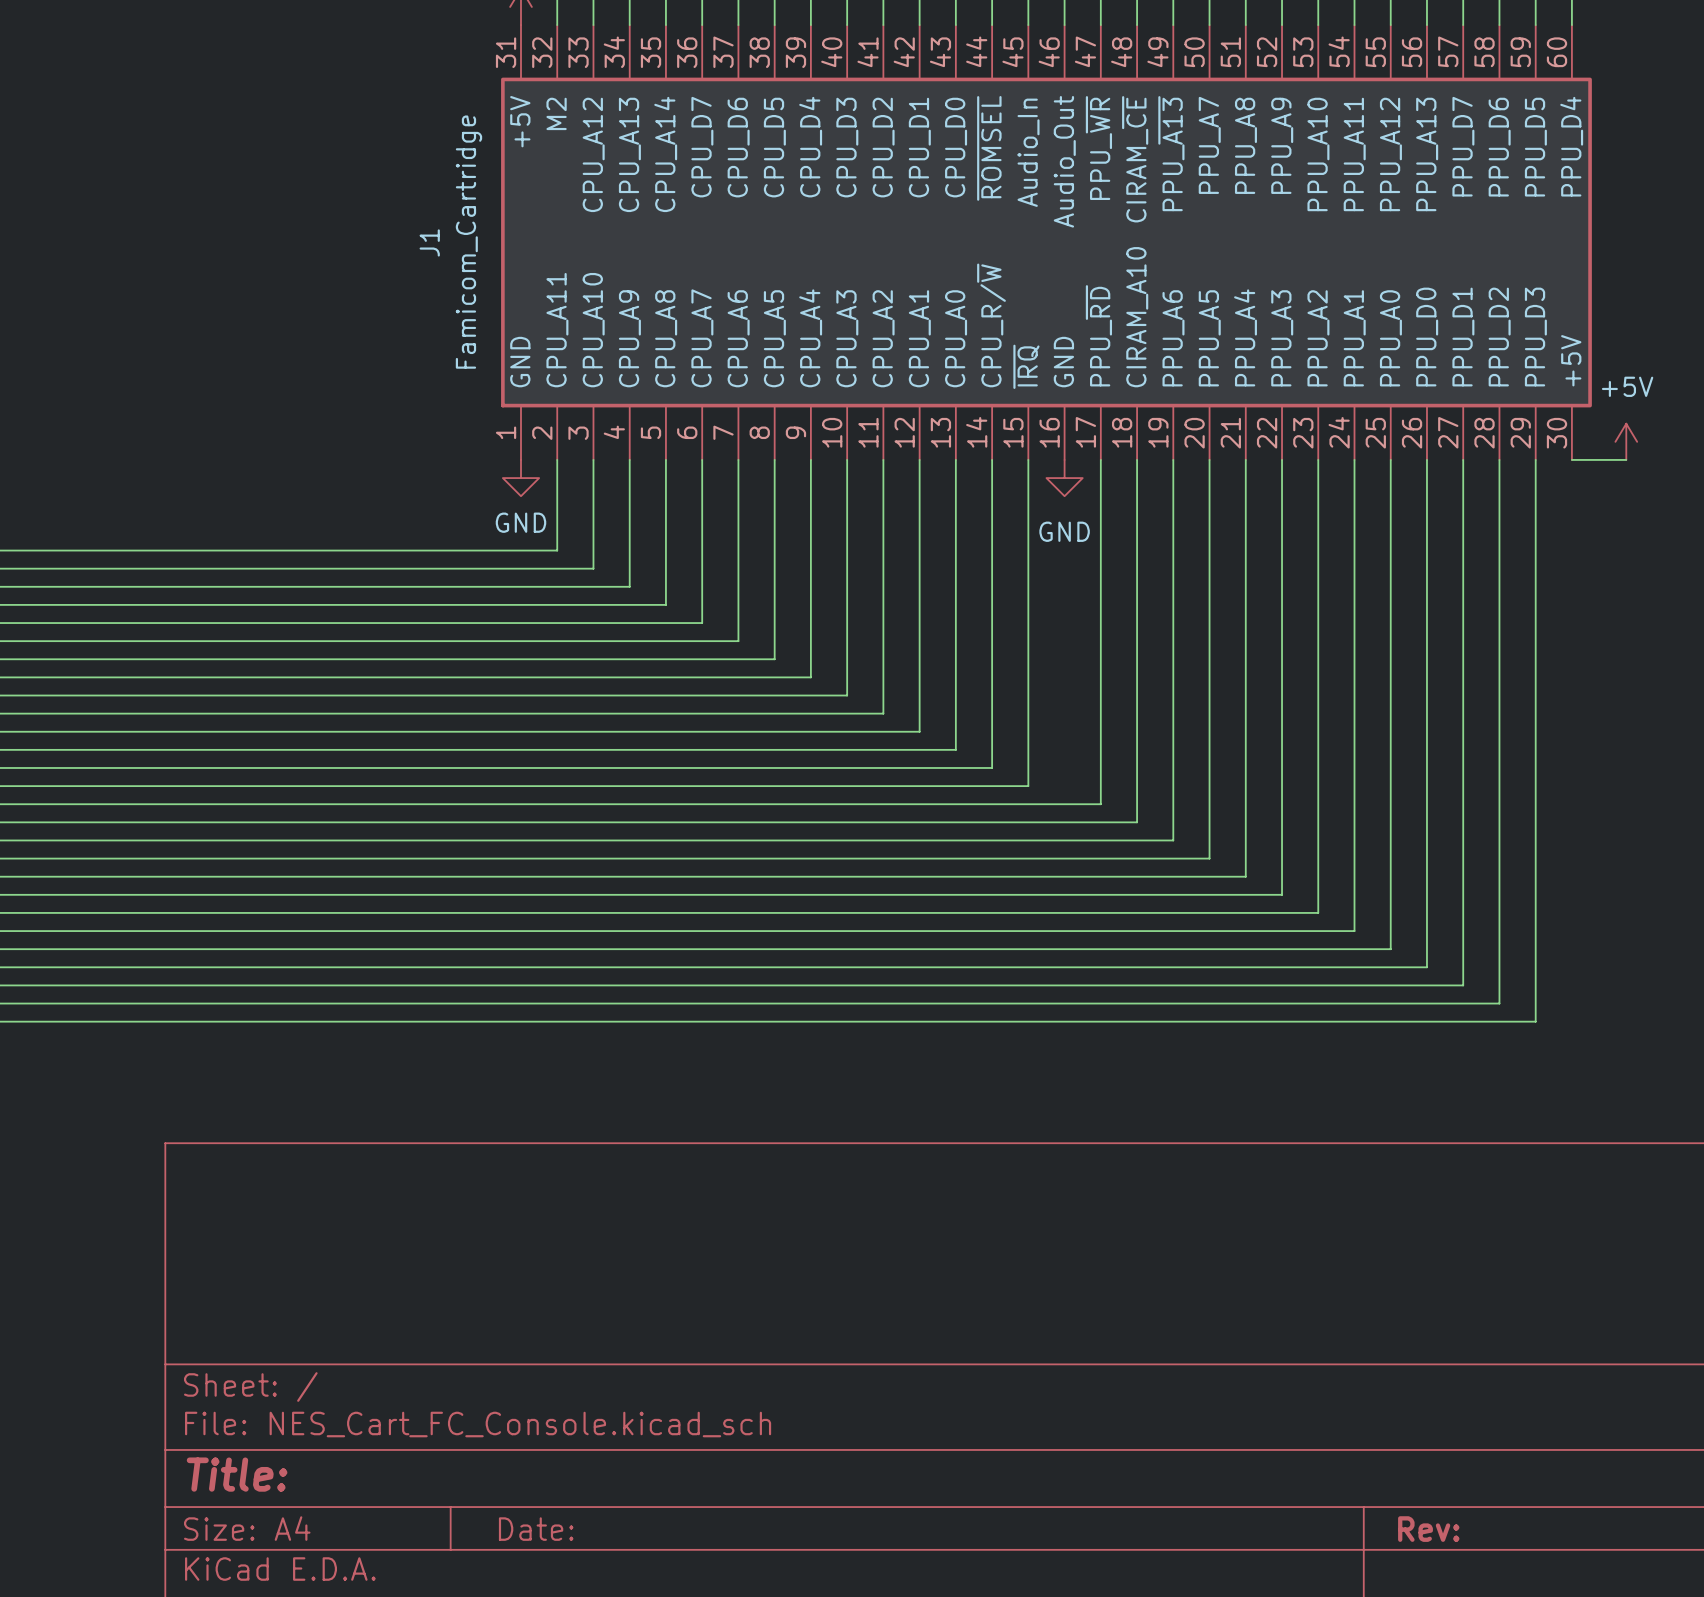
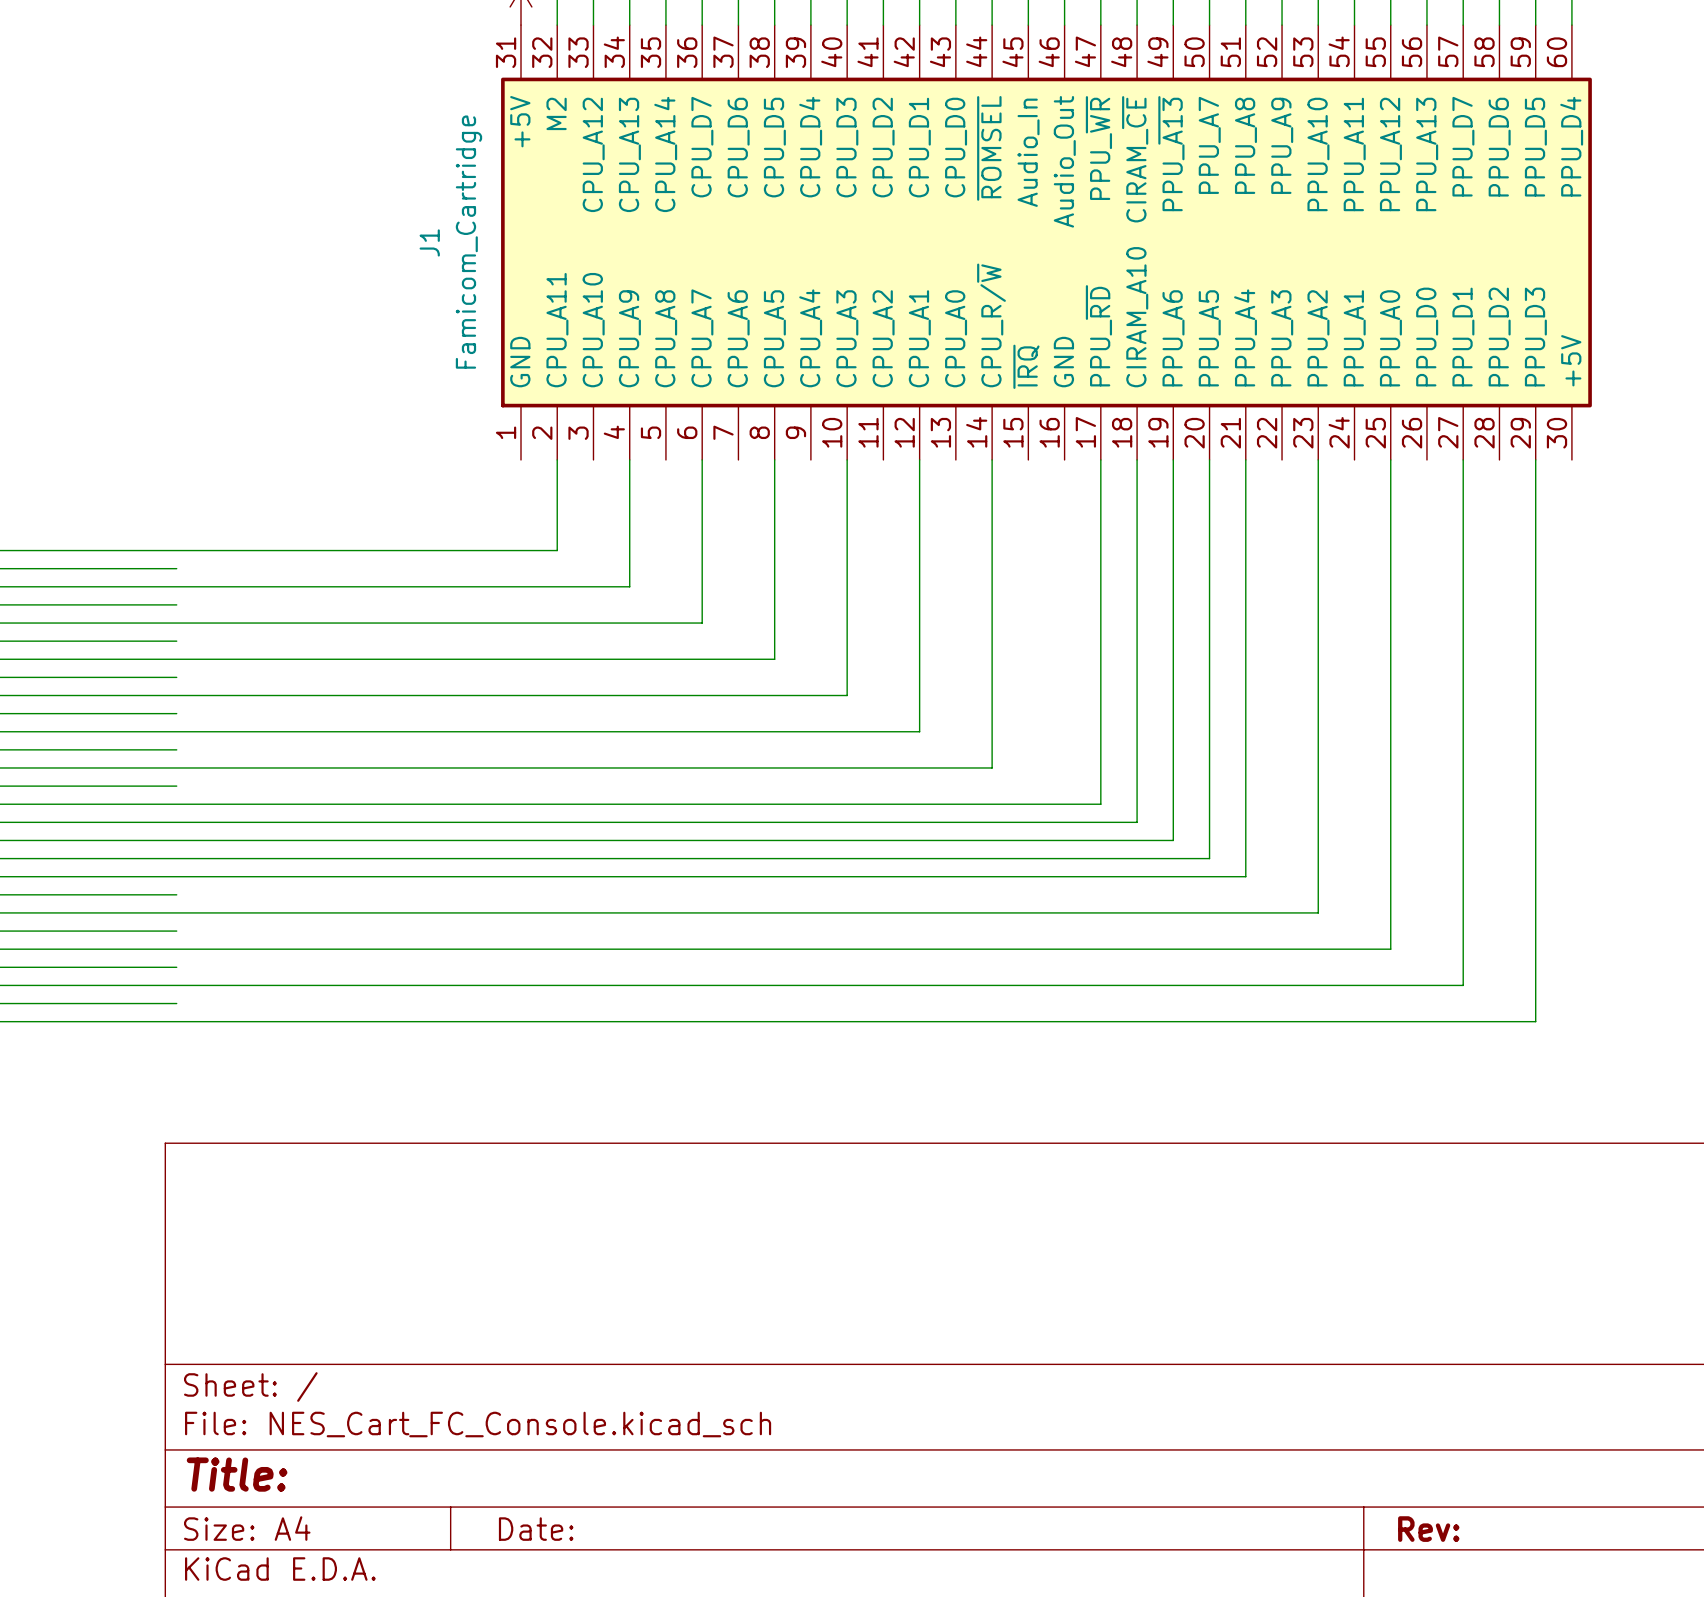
power symbol: +5V (1626, 441) -> none
wire: (593, 459) (593, 568) (176, 568) -> none
wire: (665, 459) (665, 604) (176, 604) -> none
wire: (738, 459) (738, 641) (176, 641) -> none
wire: (810, 459) (810, 677) (176, 677) -> none
wire: (883, 459) (883, 713) (176, 713) -> none
wire: (955, 459) (955, 749) (176, 749) -> none
wire: (1028, 459) (1028, 786) (176, 786) -> none
wire: (1282, 459) (1282, 894) (176, 894) -> none
wire: (1354, 459) (1354, 931) (176, 931) -> none
wire: (1426, 459) (1426, 967) (176, 967) -> none
wire: (1499, 459) (1499, 1003) (176, 1003) -> none
wire: (1571, 459) (1626, 459) -> none
power symbol: GND (521, 478) -> none
power symbol: GND (1064, 478) -> none

